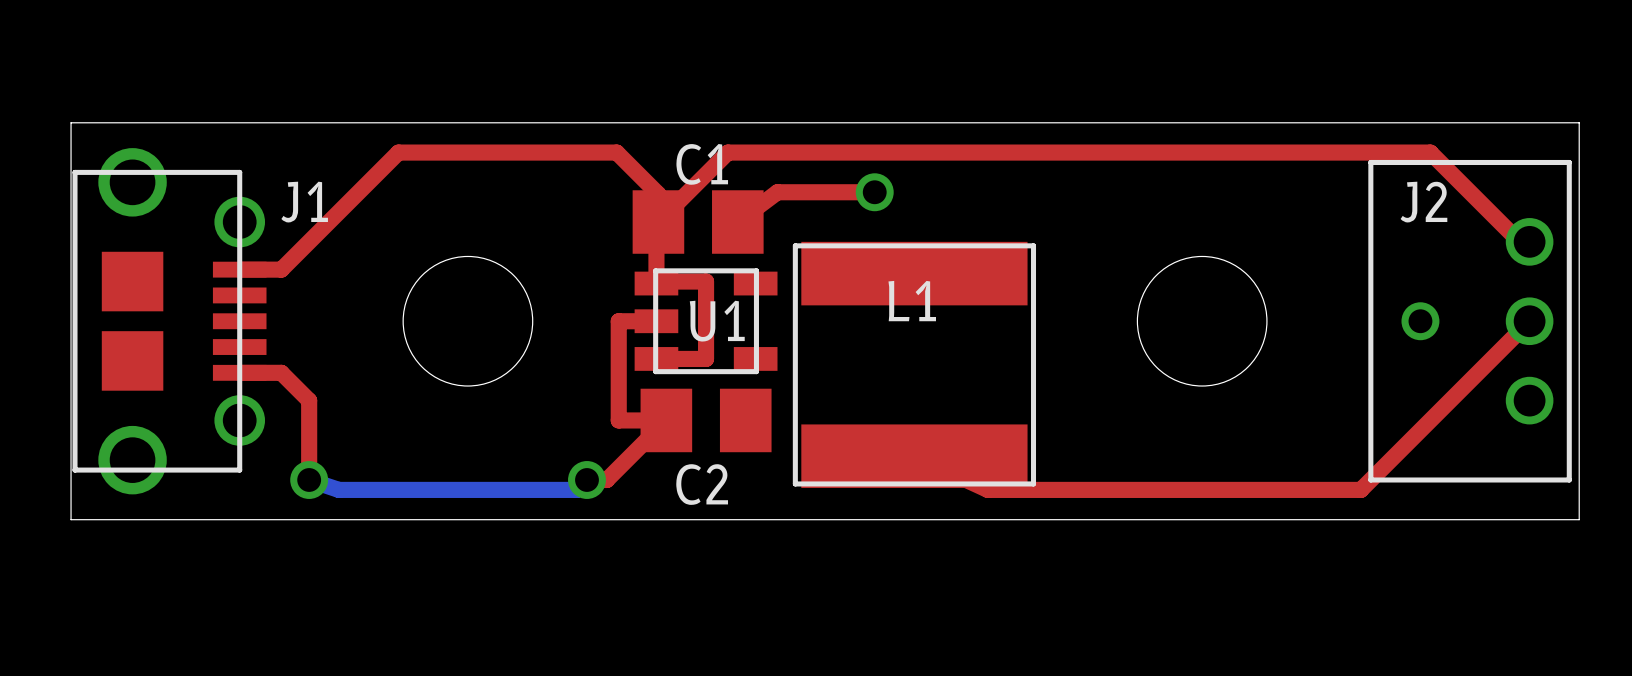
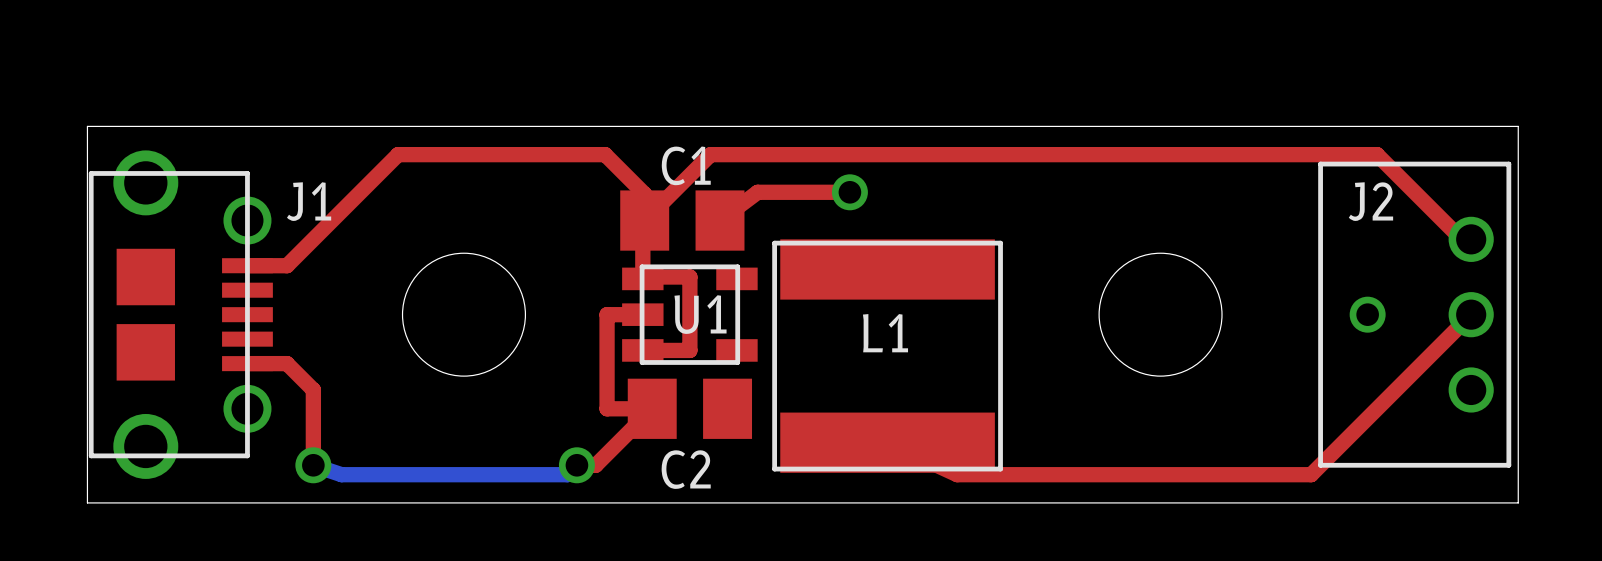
text position: L1 (912, 301) -> L1 (885, 333)

